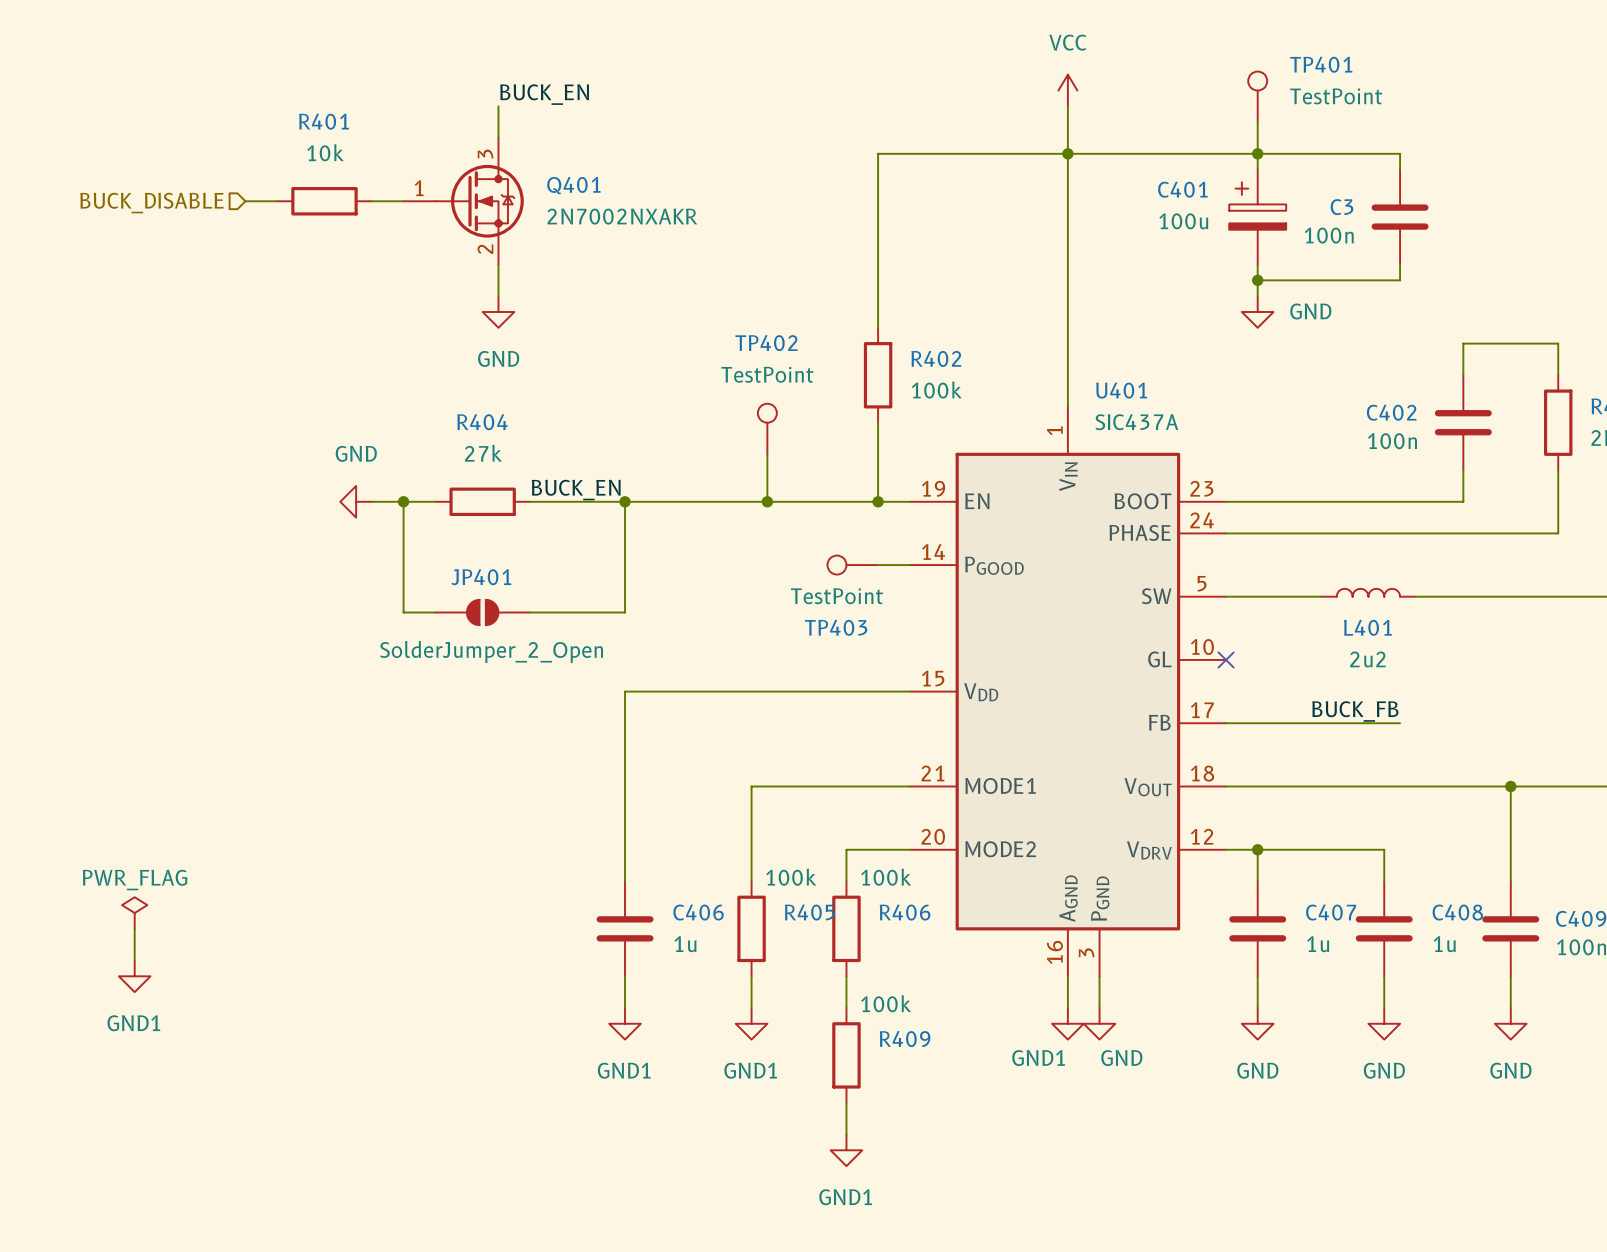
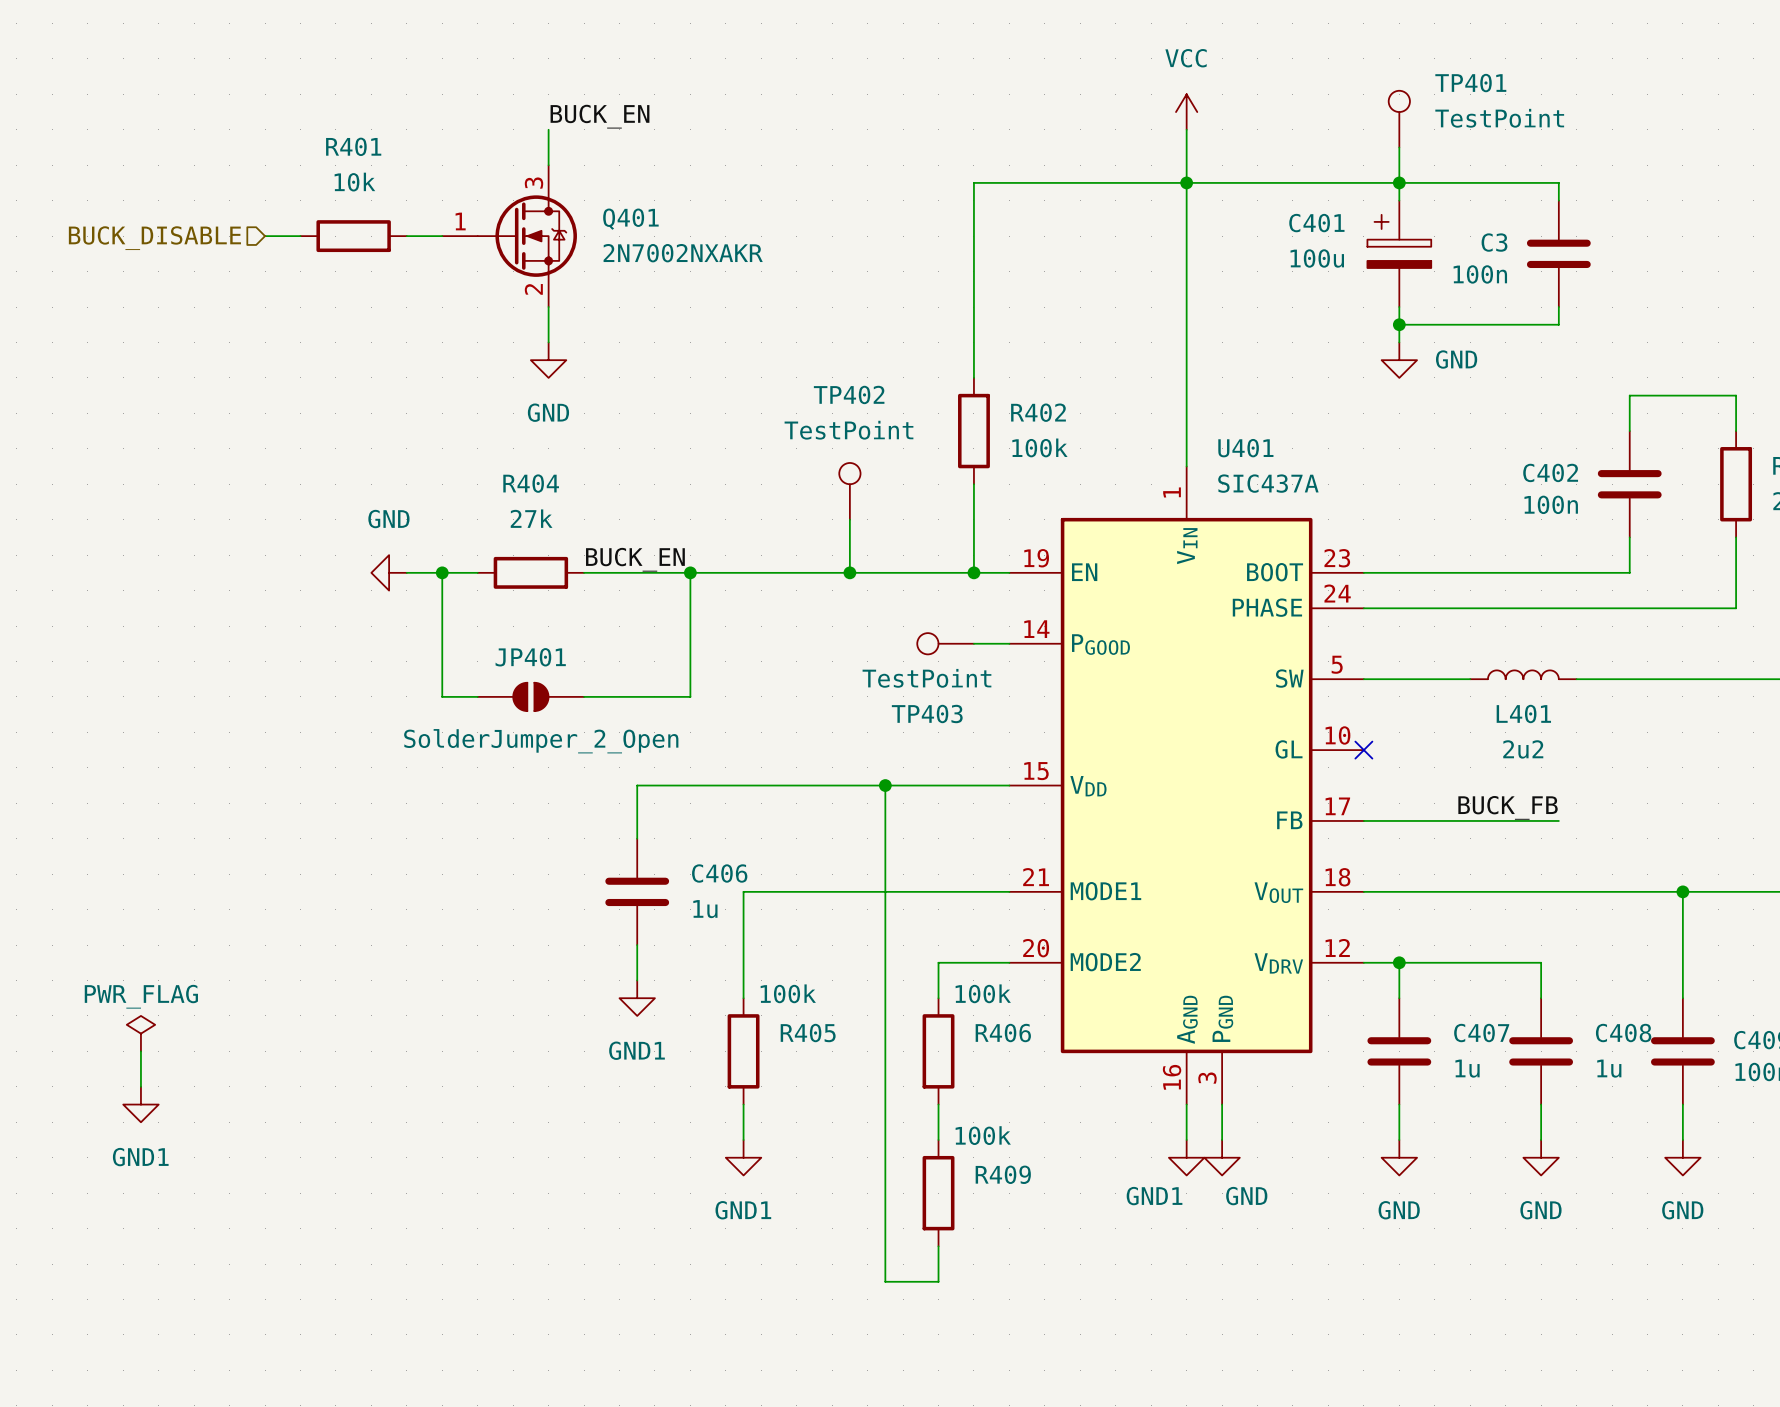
wire: (625, 691) (625, 881) -> (690, 785) (637, 785) (637, 838)
wire: none -> (885, 785) (885, 1281) (938, 1281)
junction: none -> (885, 785)
wire: (751, 786) (751, 881) -> (832, 891) (743, 891) (743, 998)
power symbol: none -> GND1 (637, 998)
C406 position: (625, 928) -> (637, 891)
R405 position: (751, 928) -> (743, 1051)
wire: (625, 976) (625, 1007) -> (743, 1104) (743, 1140)
wire: (751, 976) (751, 1007) -> (637, 945) (637, 980)
power symbol: GND1 (625, 1023) -> none
power symbol: none -> GND1 (743, 1157)
power symbol: GND1 (751, 1023) -> none
power symbol: GND1 (846, 1150) -> none

